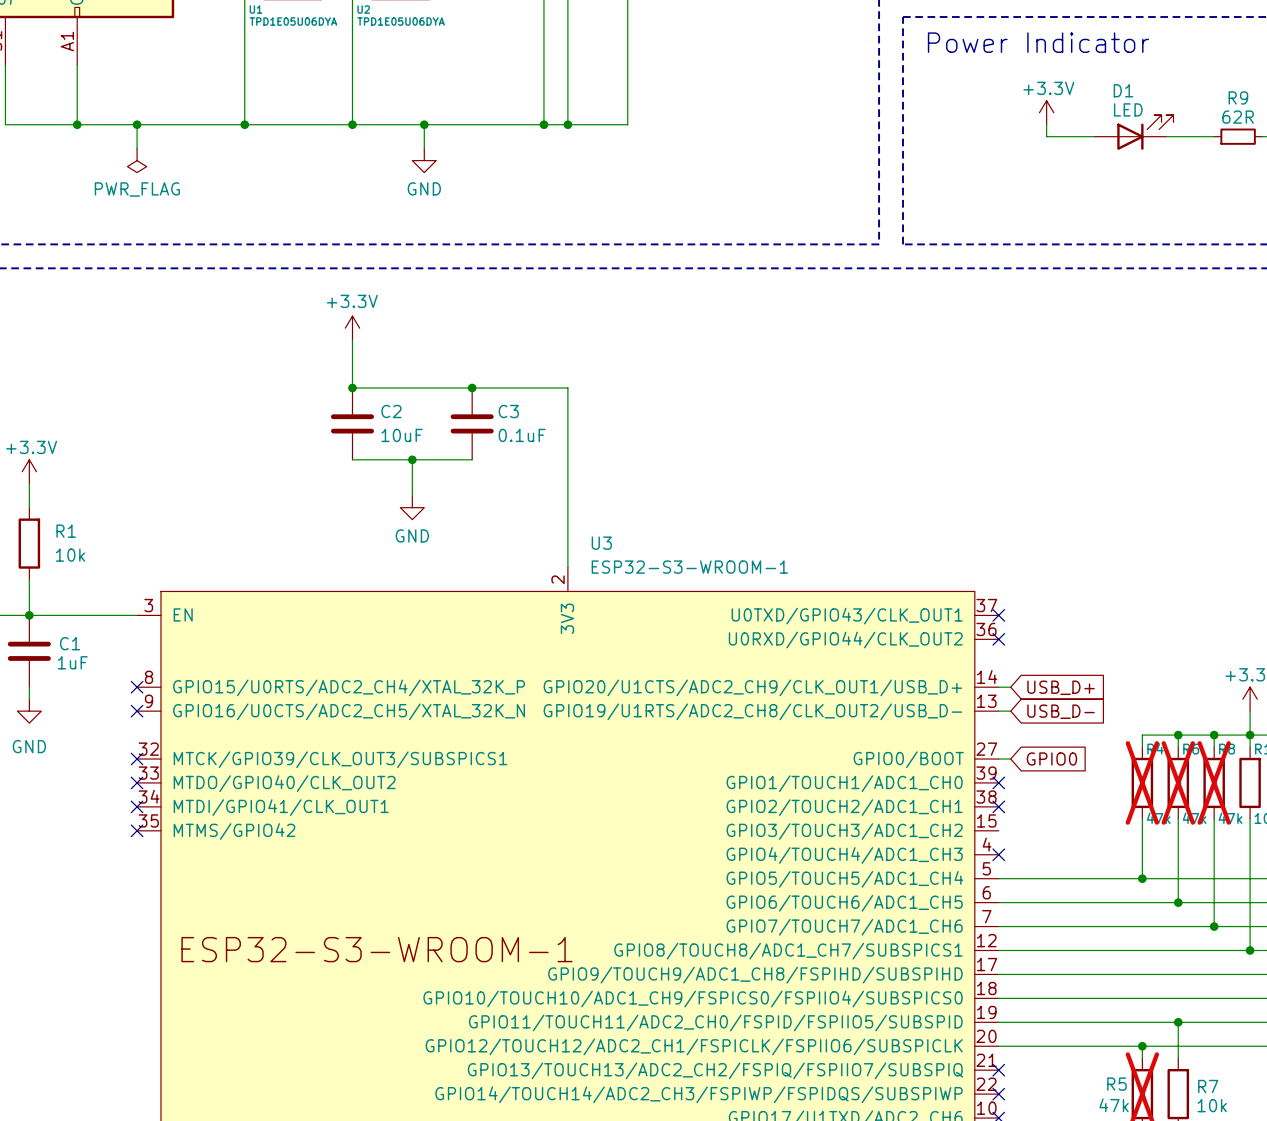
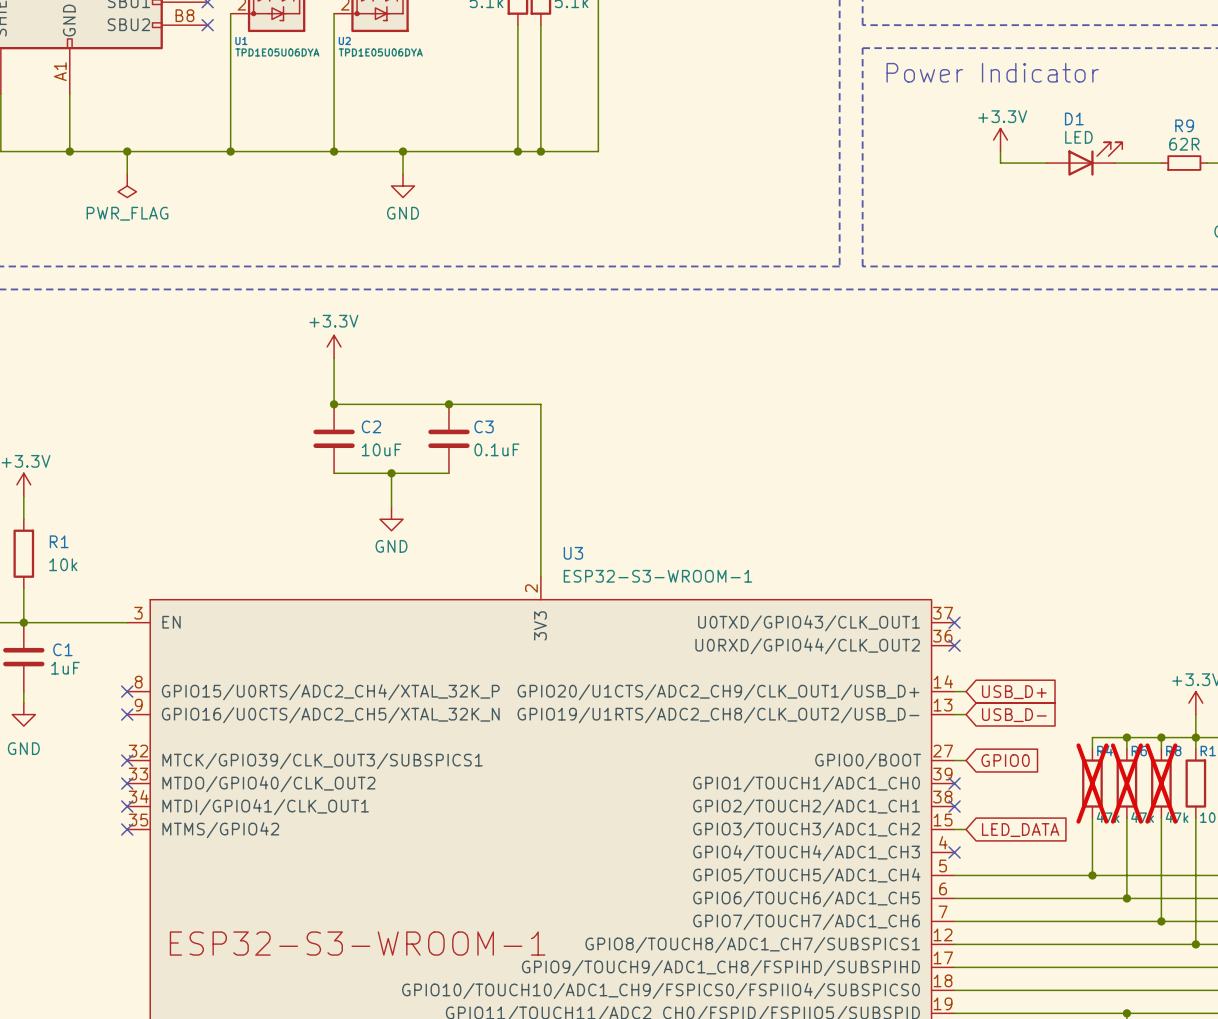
wire: none -> (954, 829) (966, 829)
global label: none -> LED_DATA (1020, 830)

